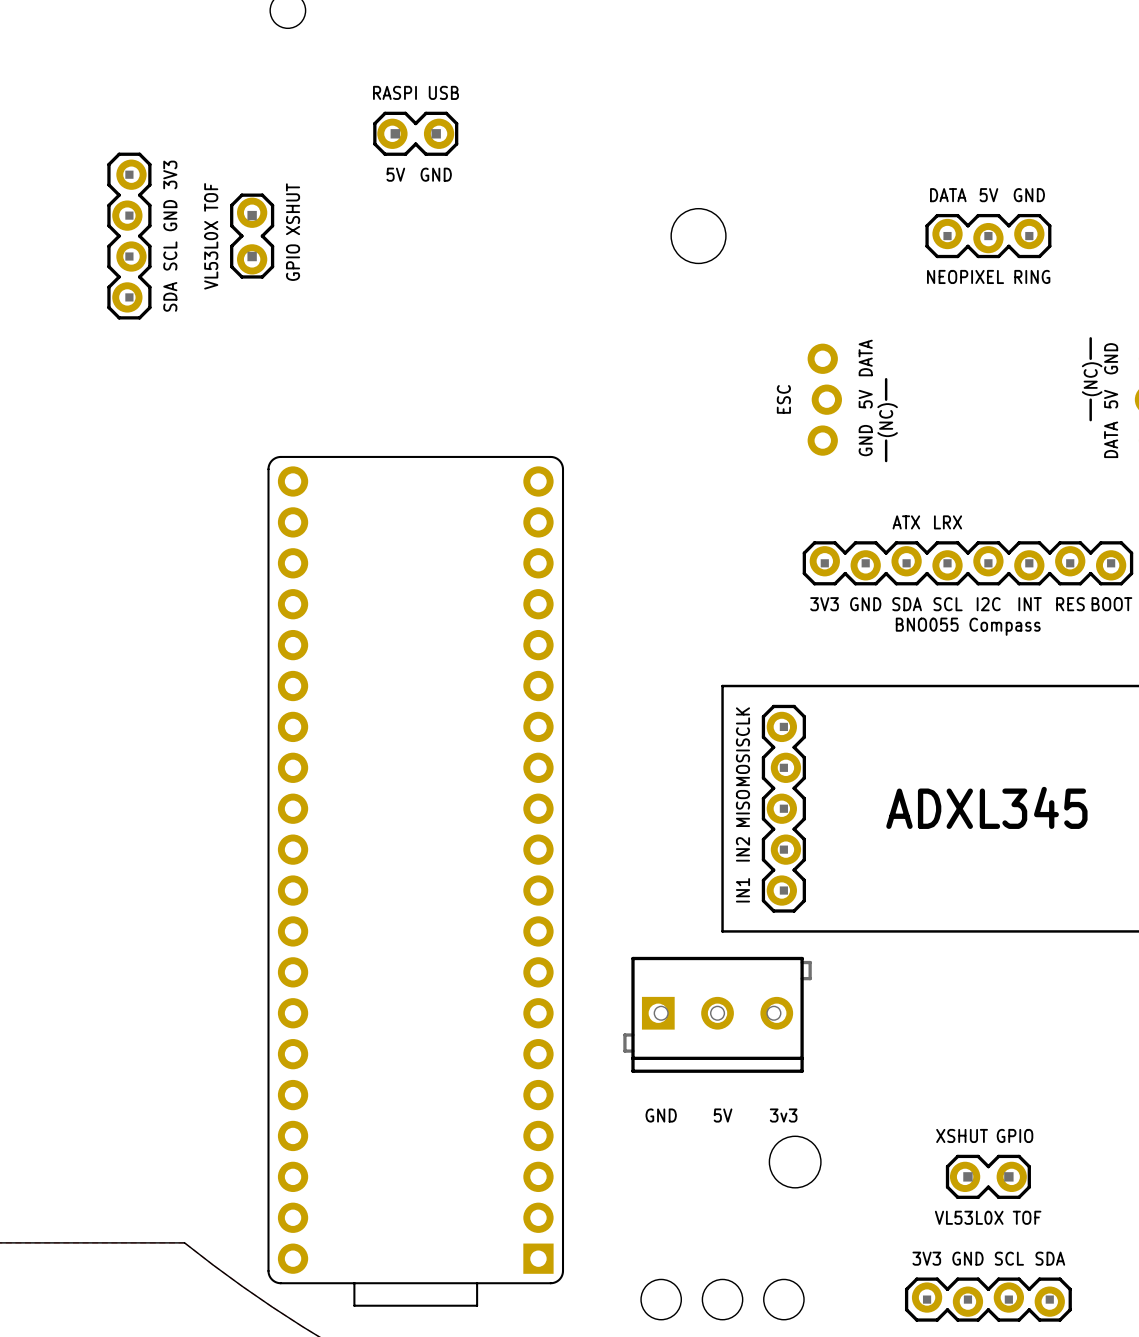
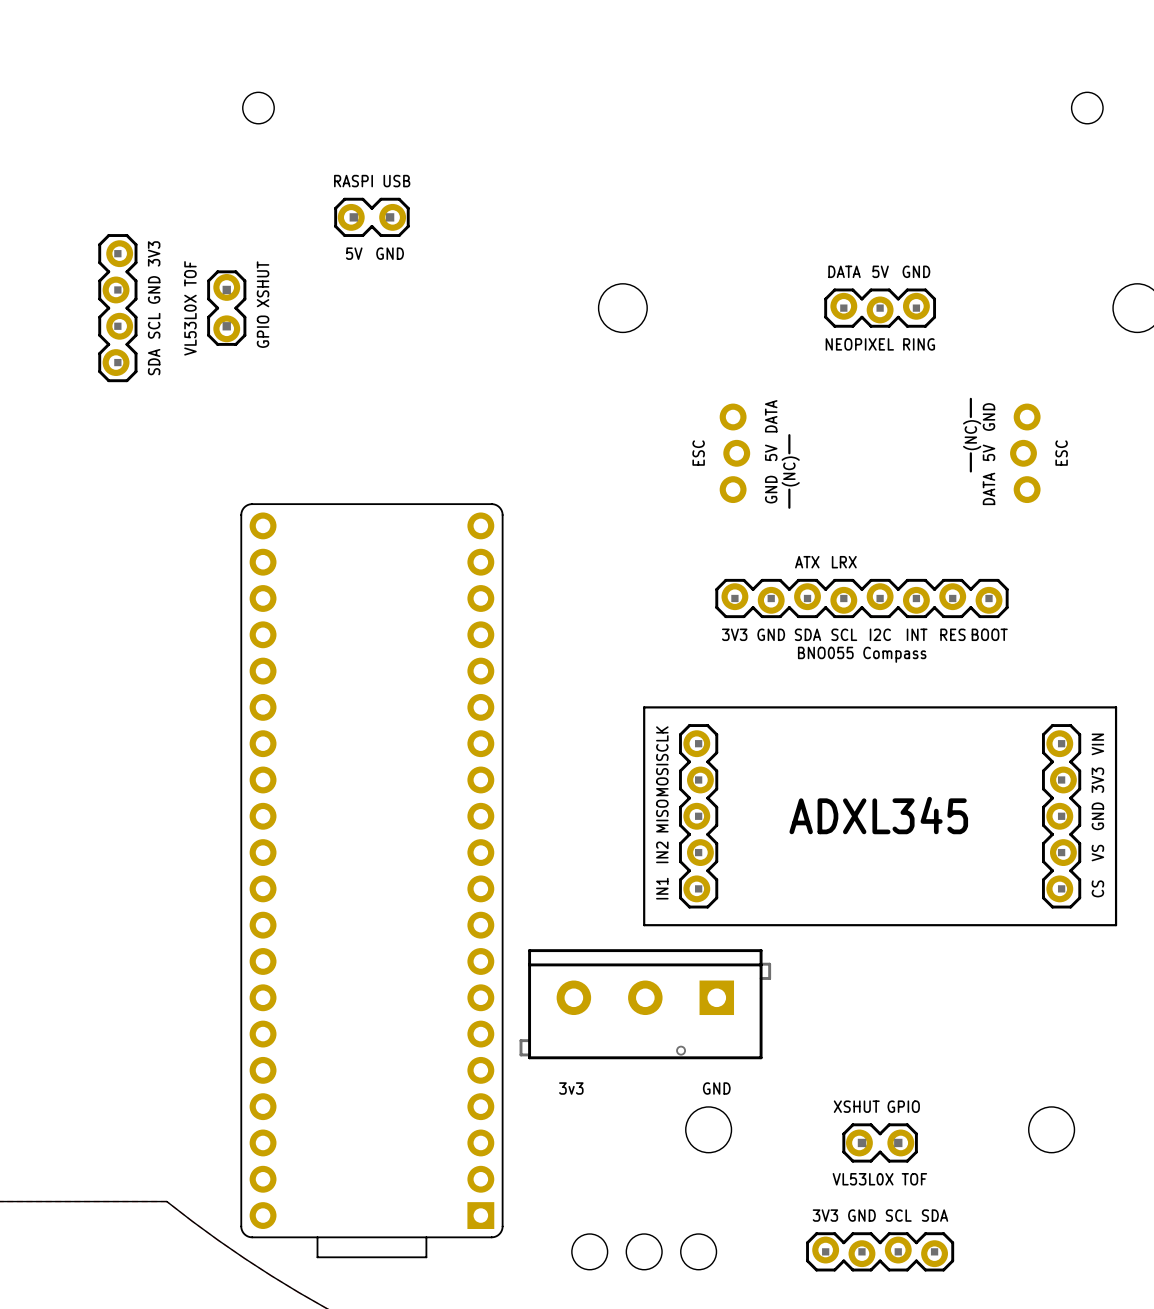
part footprint: [623, 956, 812, 1073] -> [519, 949, 772, 1060]
text position: GND (661, 1115) -> GND (716, 1088)
text: 5V (723, 1115) -> none
text position: 3v3 (783, 1115) -> 3v3 (571, 1088)

